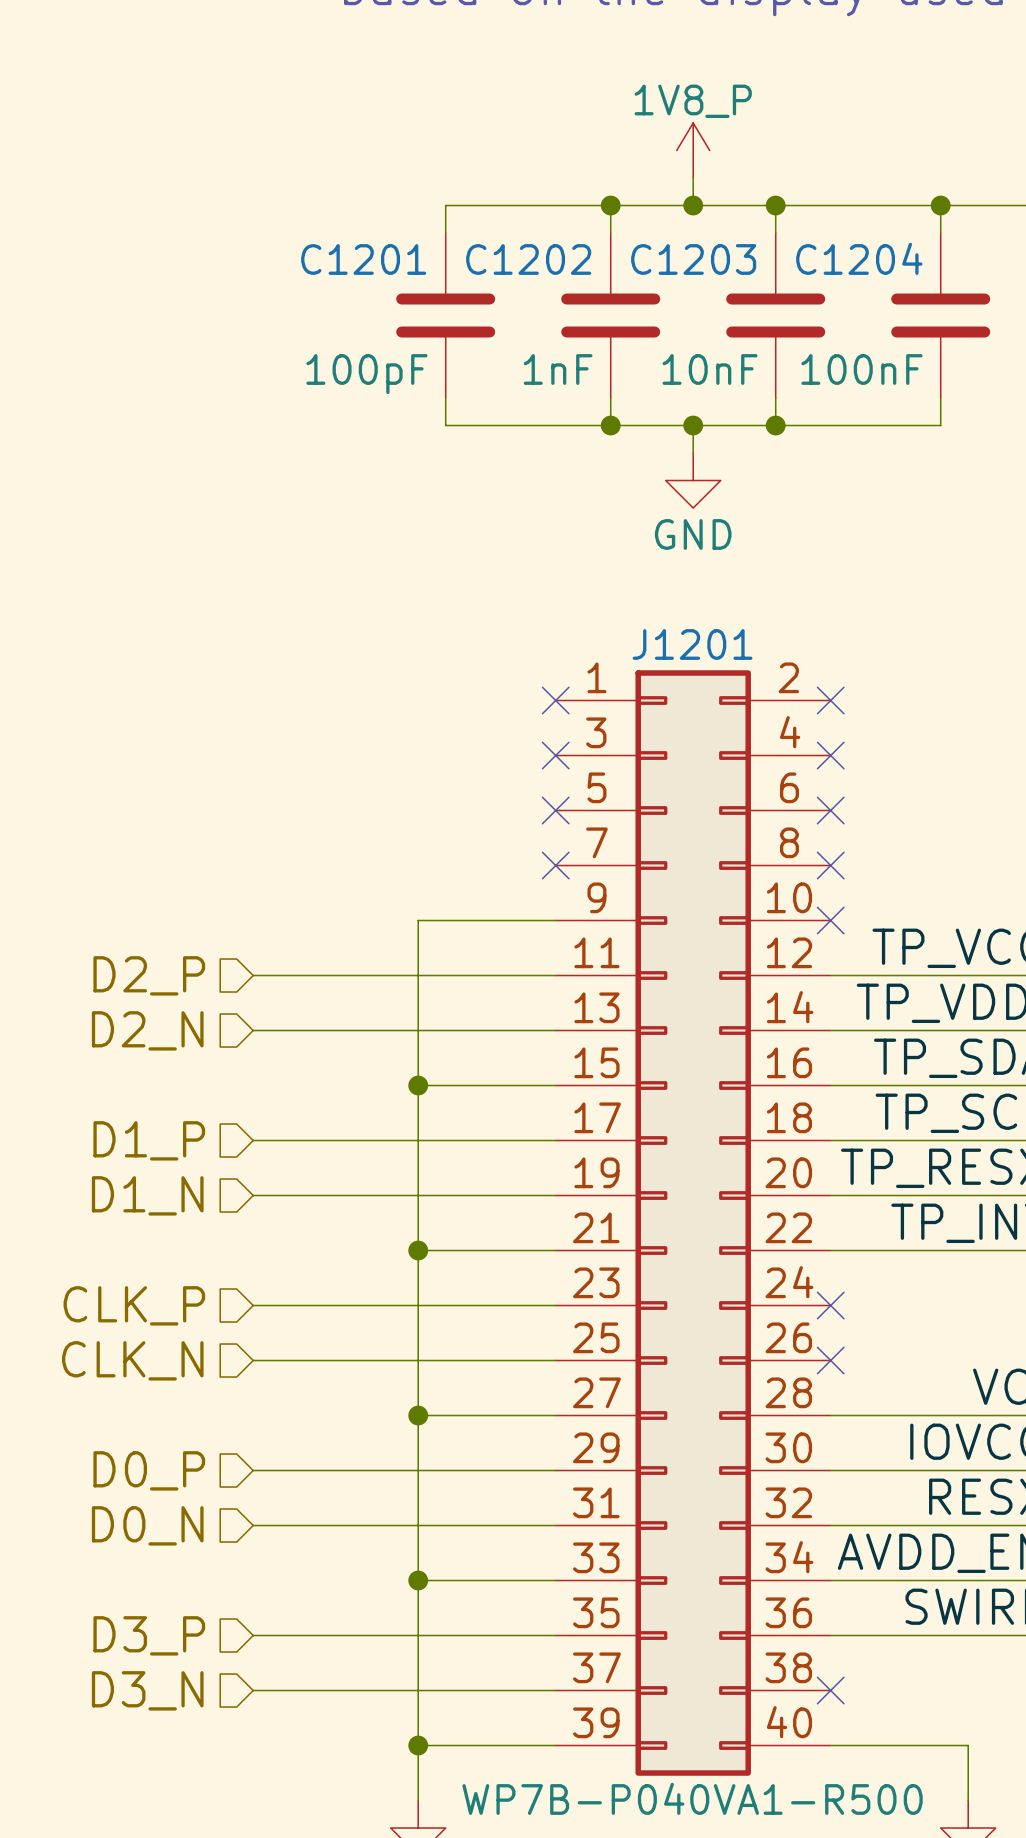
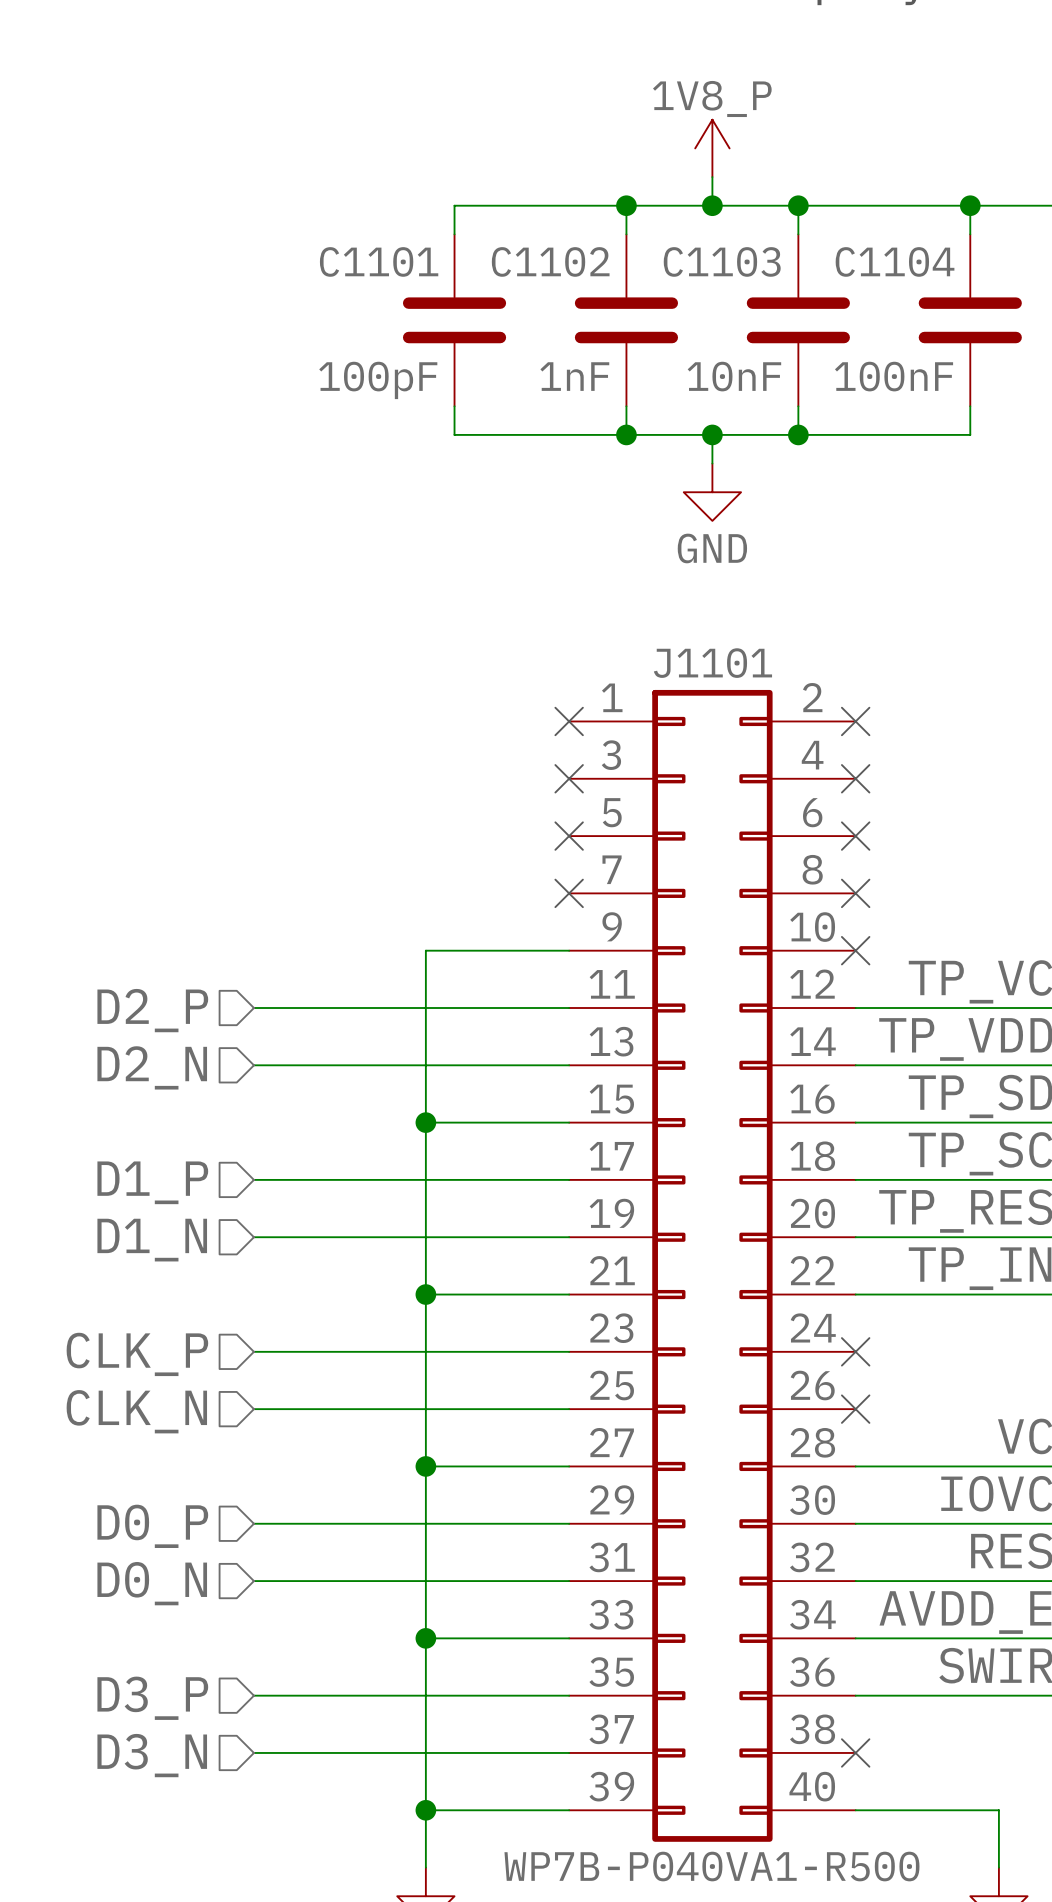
C1204 name: C1204 (859, 258) -> C1104 (895, 261)
C1201 name: C1201 (363, 259) -> C1101 (379, 261)
C1202 name: C1202 (528, 259) -> C1102 (550, 261)
C1203 name: C1203 (693, 259) -> C1103 (722, 261)
J1201 name: J1201 (692, 644) -> J1101 (712, 663)

